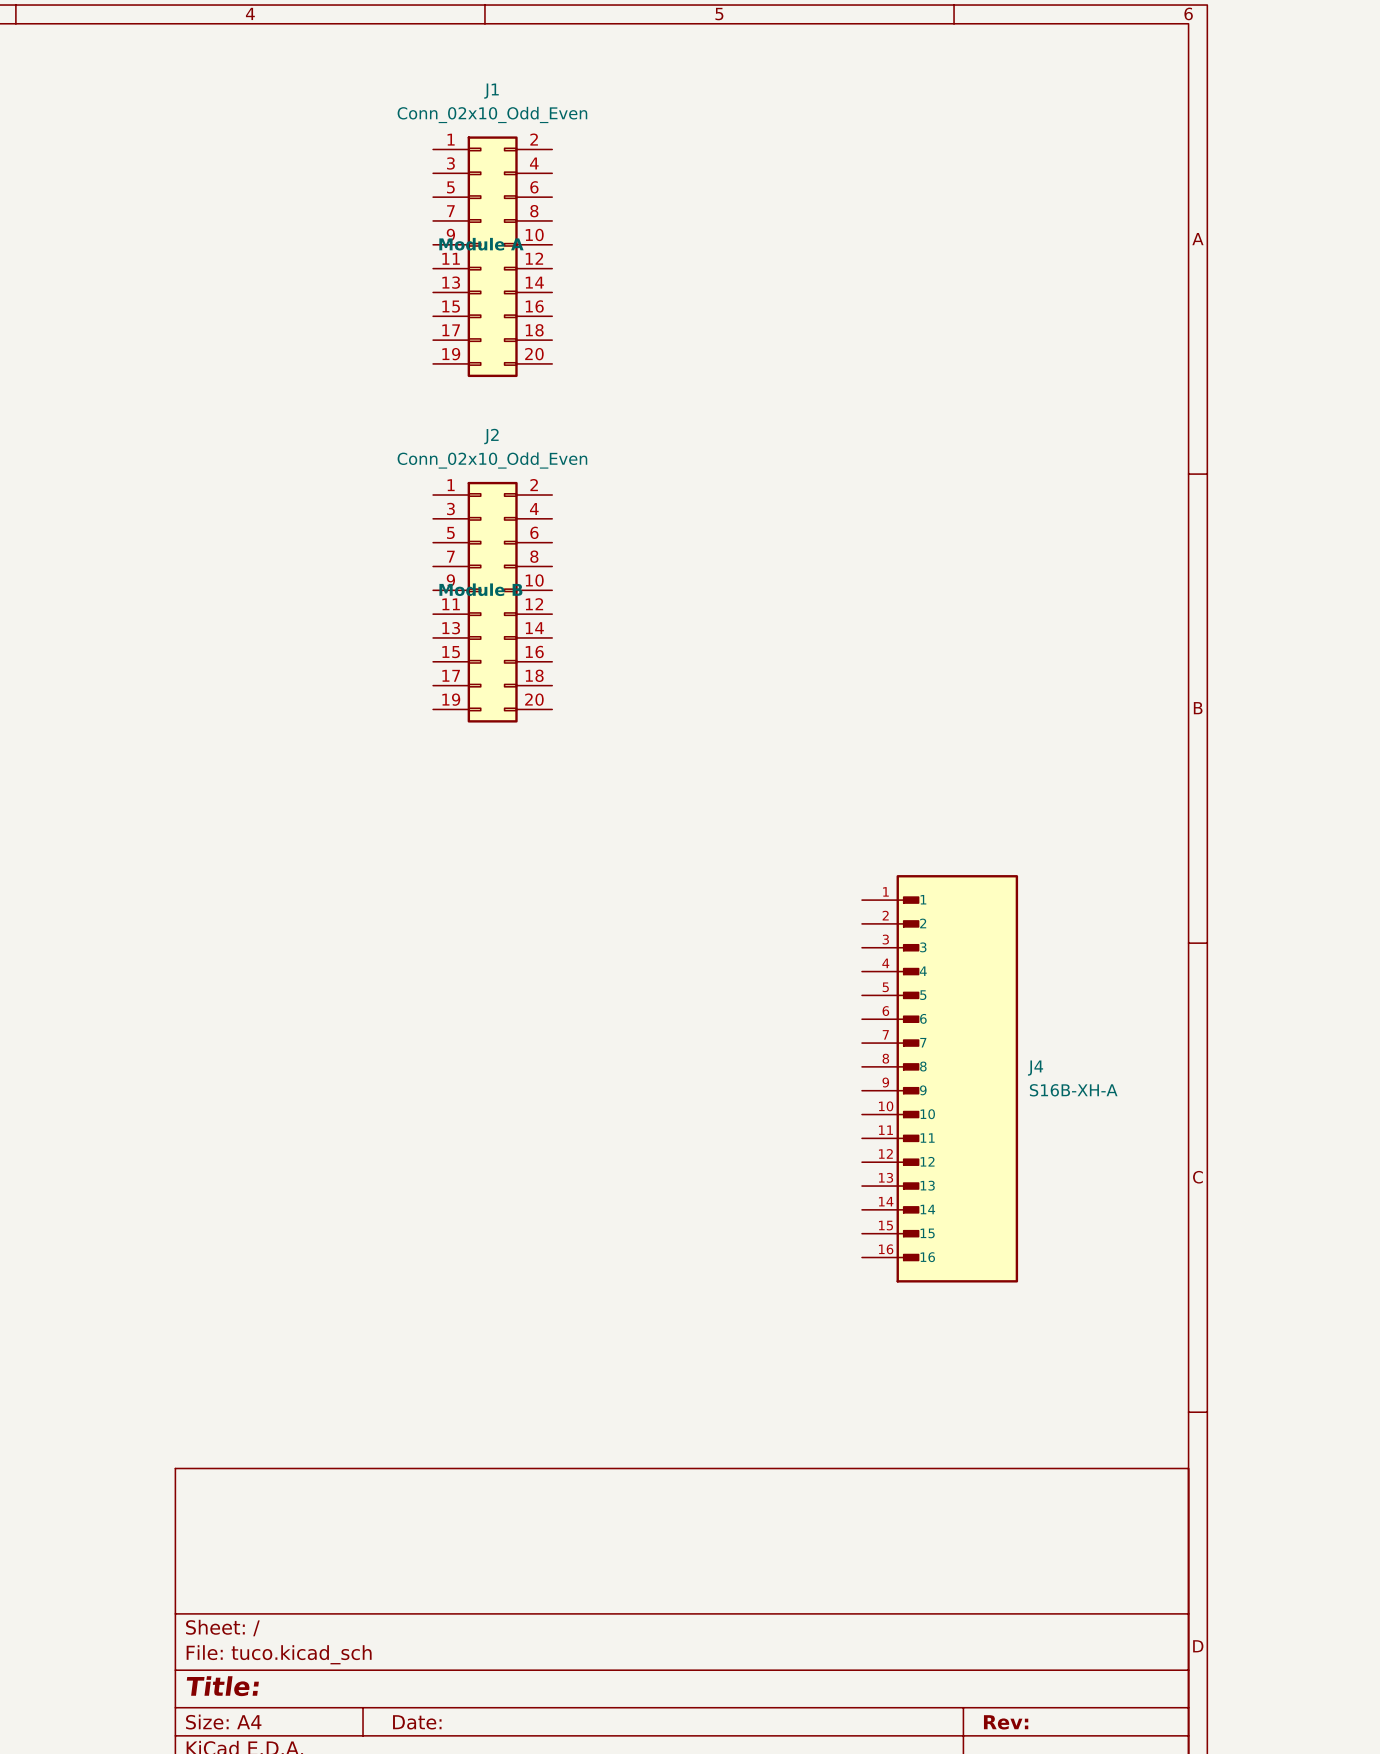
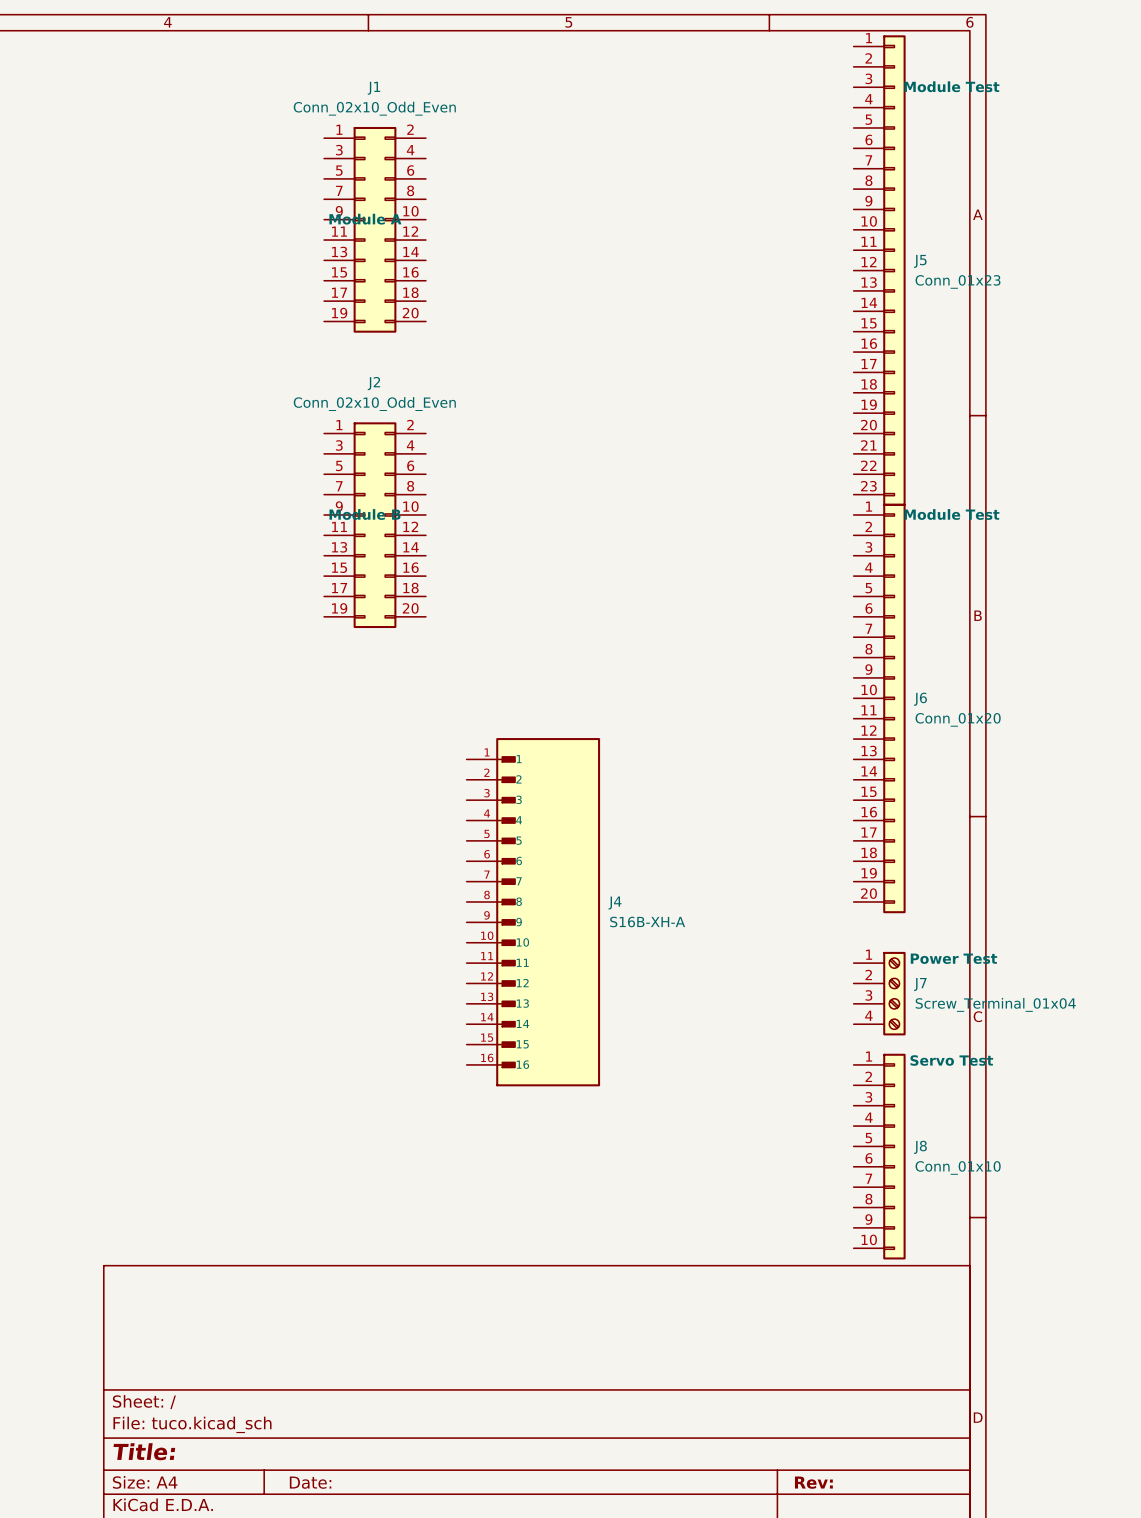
J5: none -> Conn_01x23 (879, 270)
J6: none -> Conn_01x20 (879, 708)
J4 position: (940, 1078) -> (533, 912)
J7: none -> Screw_Terminal_01x04 (879, 993)
J8: none -> Conn_01x10 (879, 1156)

